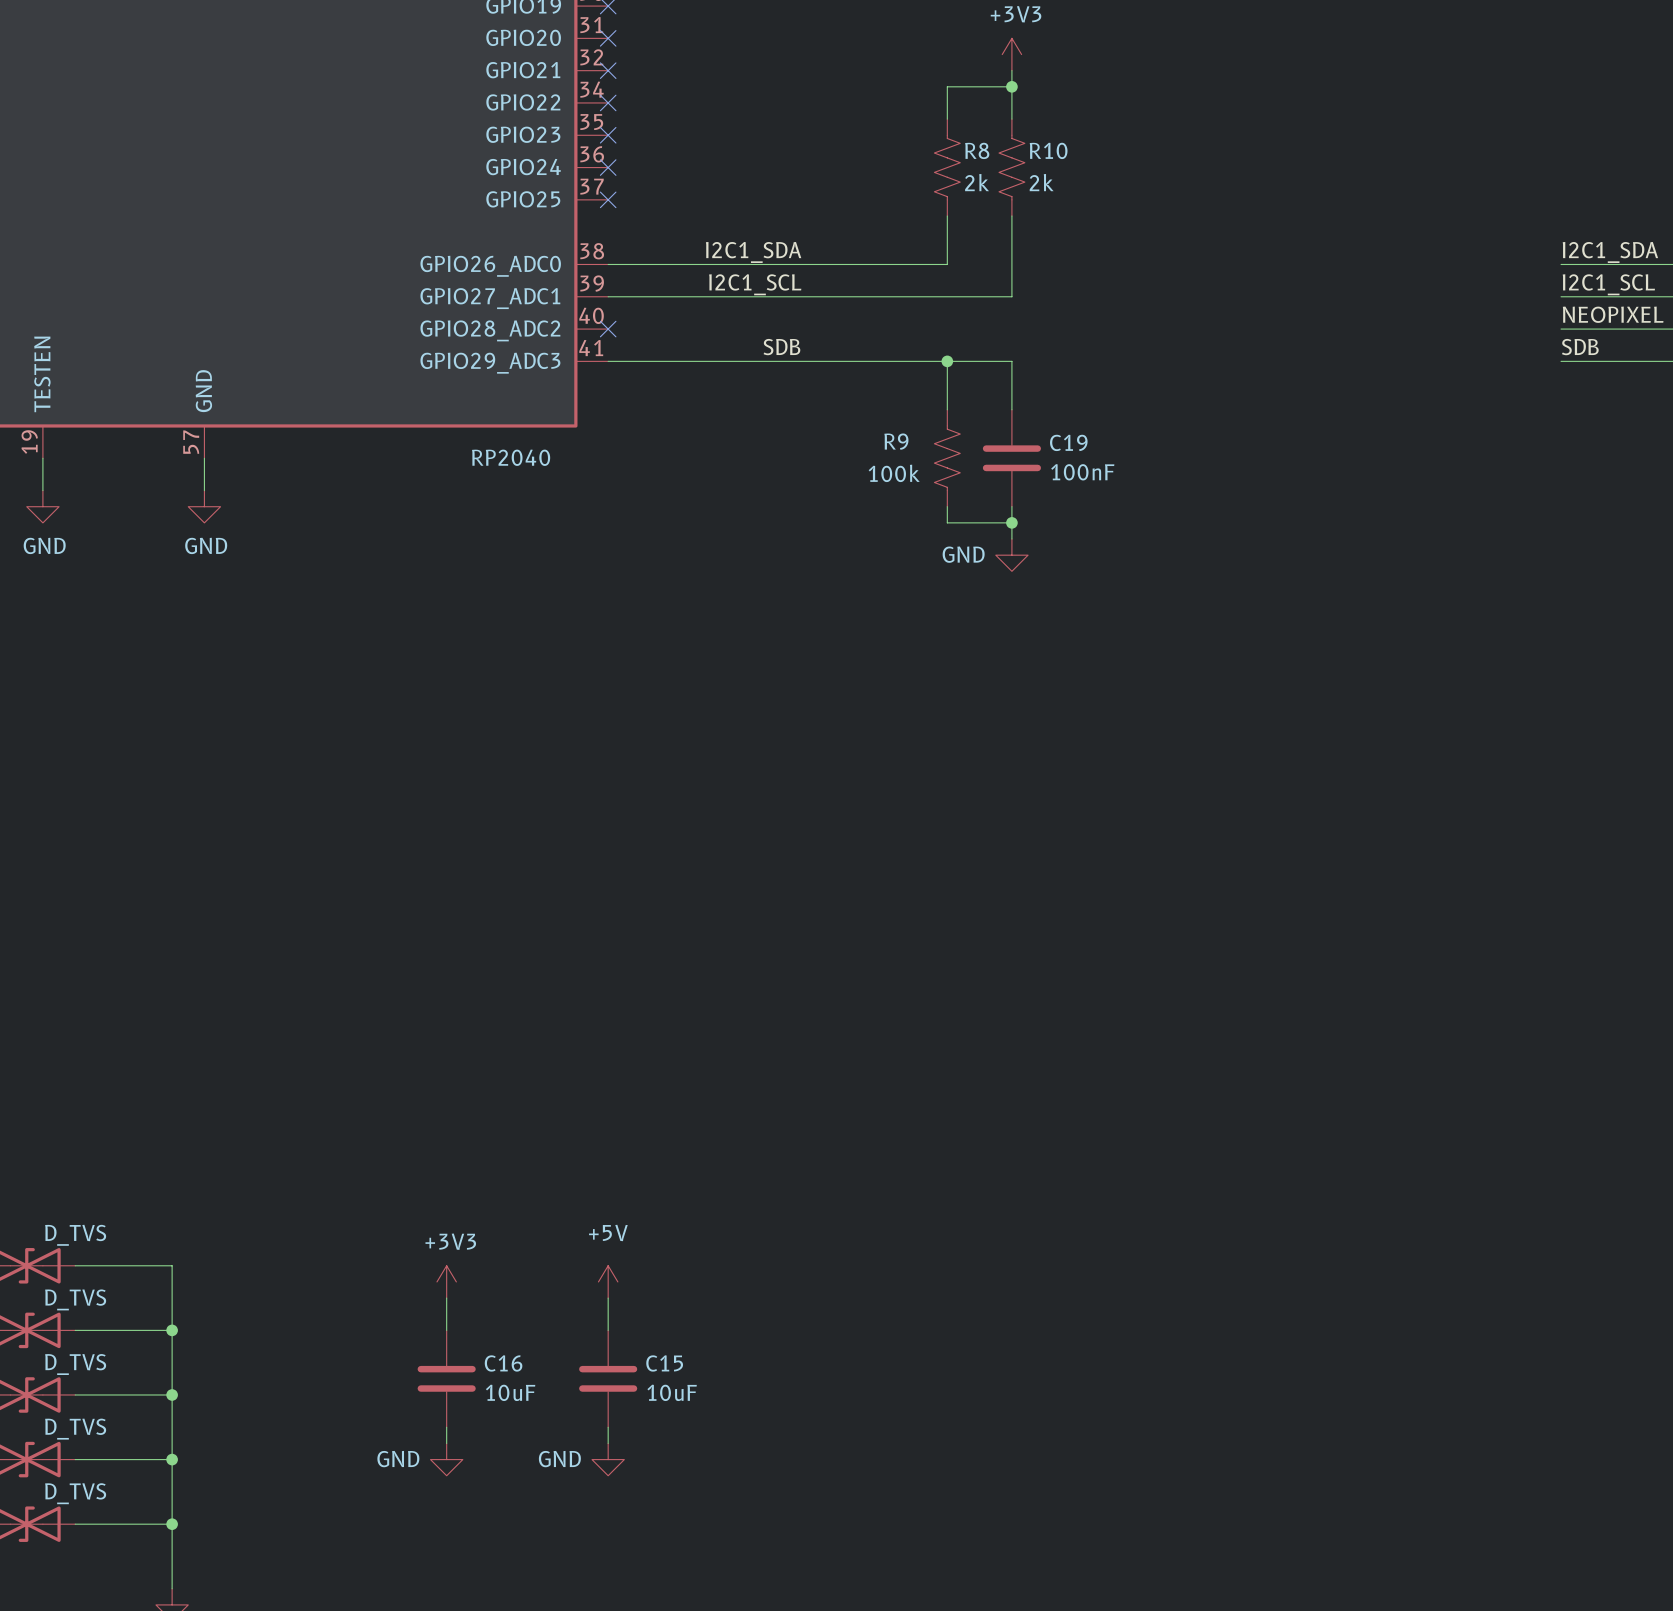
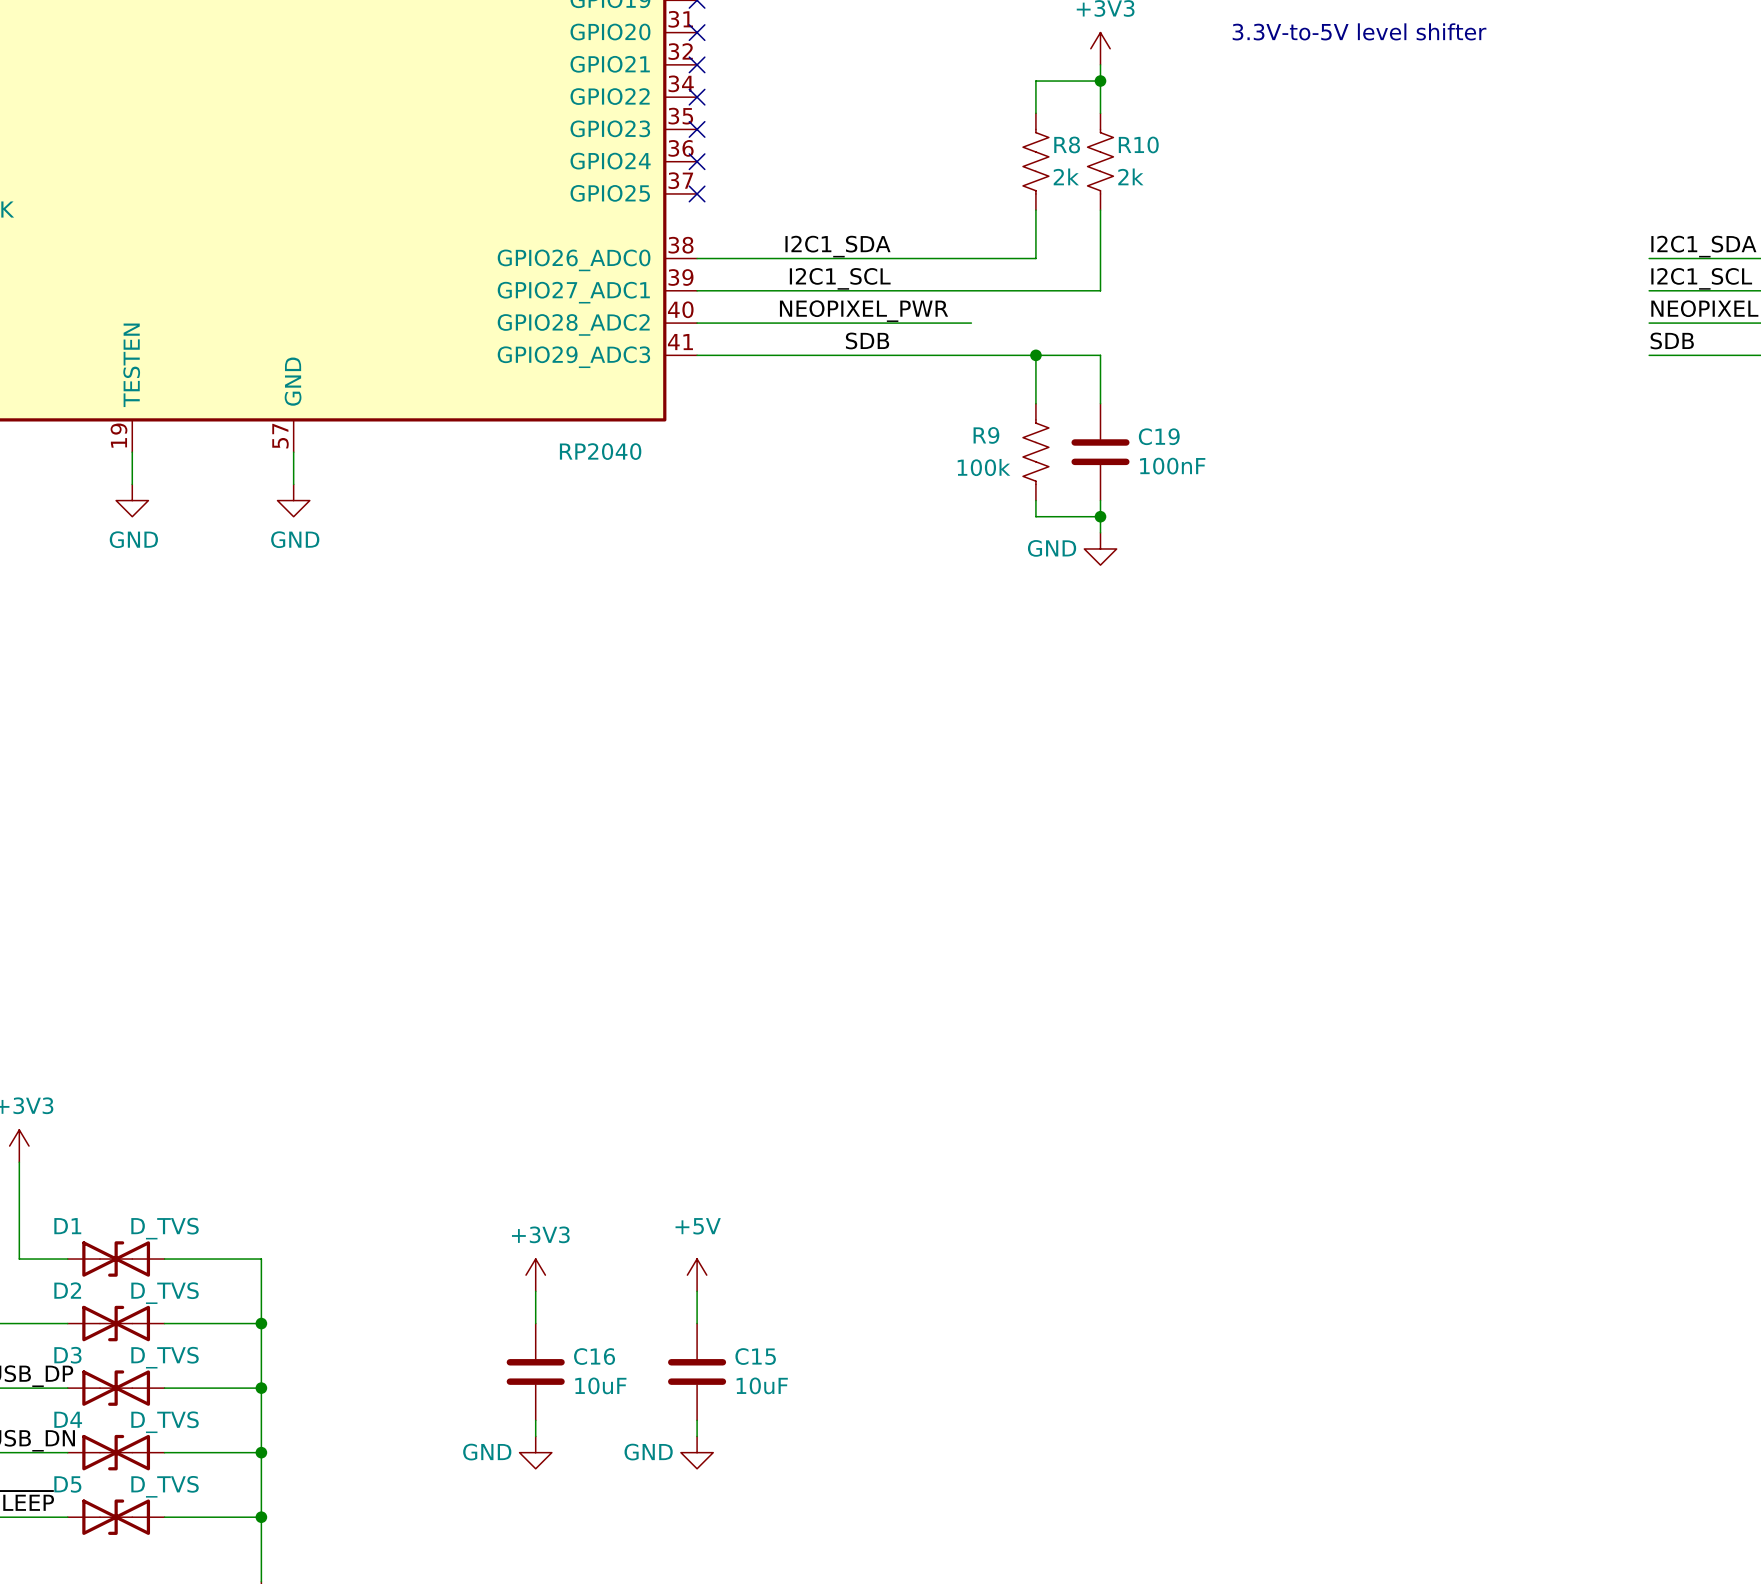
text: none -> 3.3V-to-5V level shifter (1359, 31)
label: none -> NEOPIXEL_PWR (864, 311)
wire: none -> (697, 323) (971, 323)
no-connect mark: (608, 329) -> none

